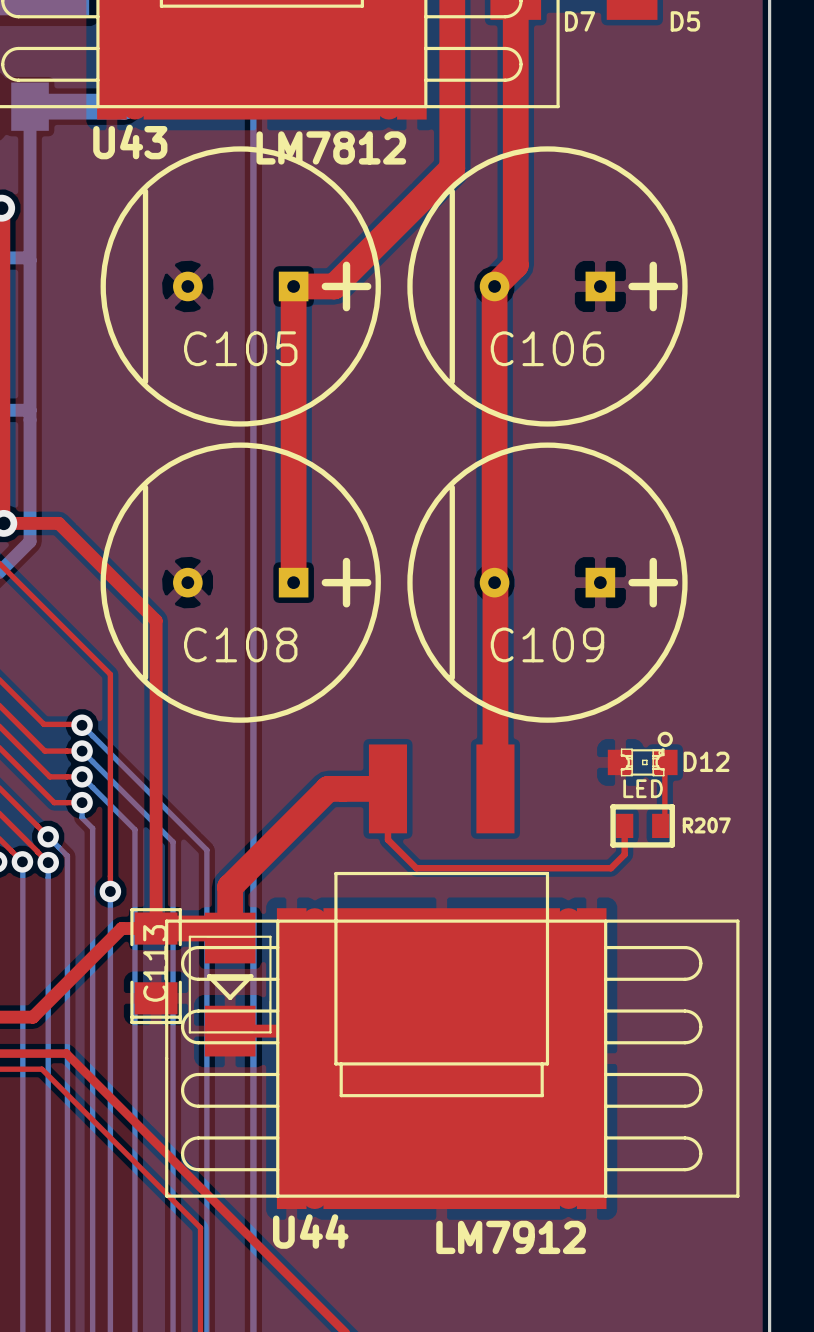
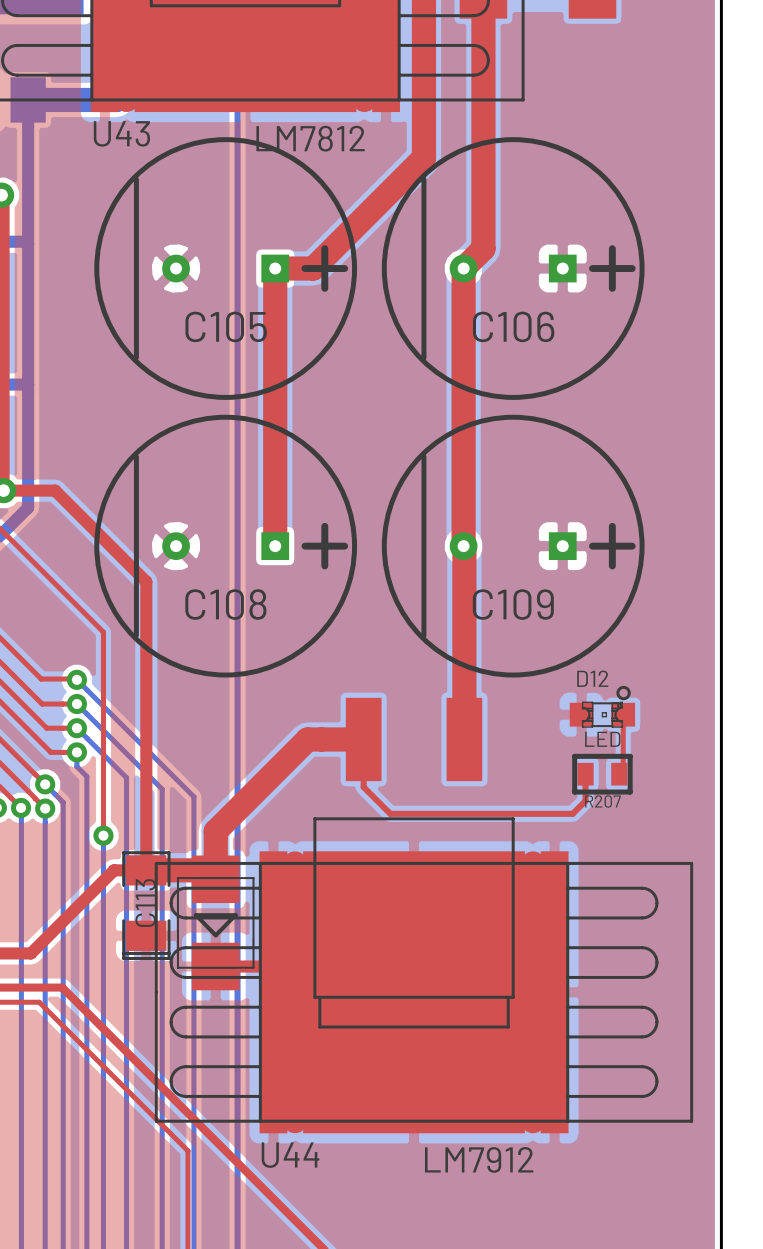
D7 name: D7 (580, 21) -> none
D5 name: D5 (685, 21) -> none
D12 name position: D12 (706, 761) -> D12 (592, 678)
R207 name position: R207 (706, 825) -> R207 (603, 801)

